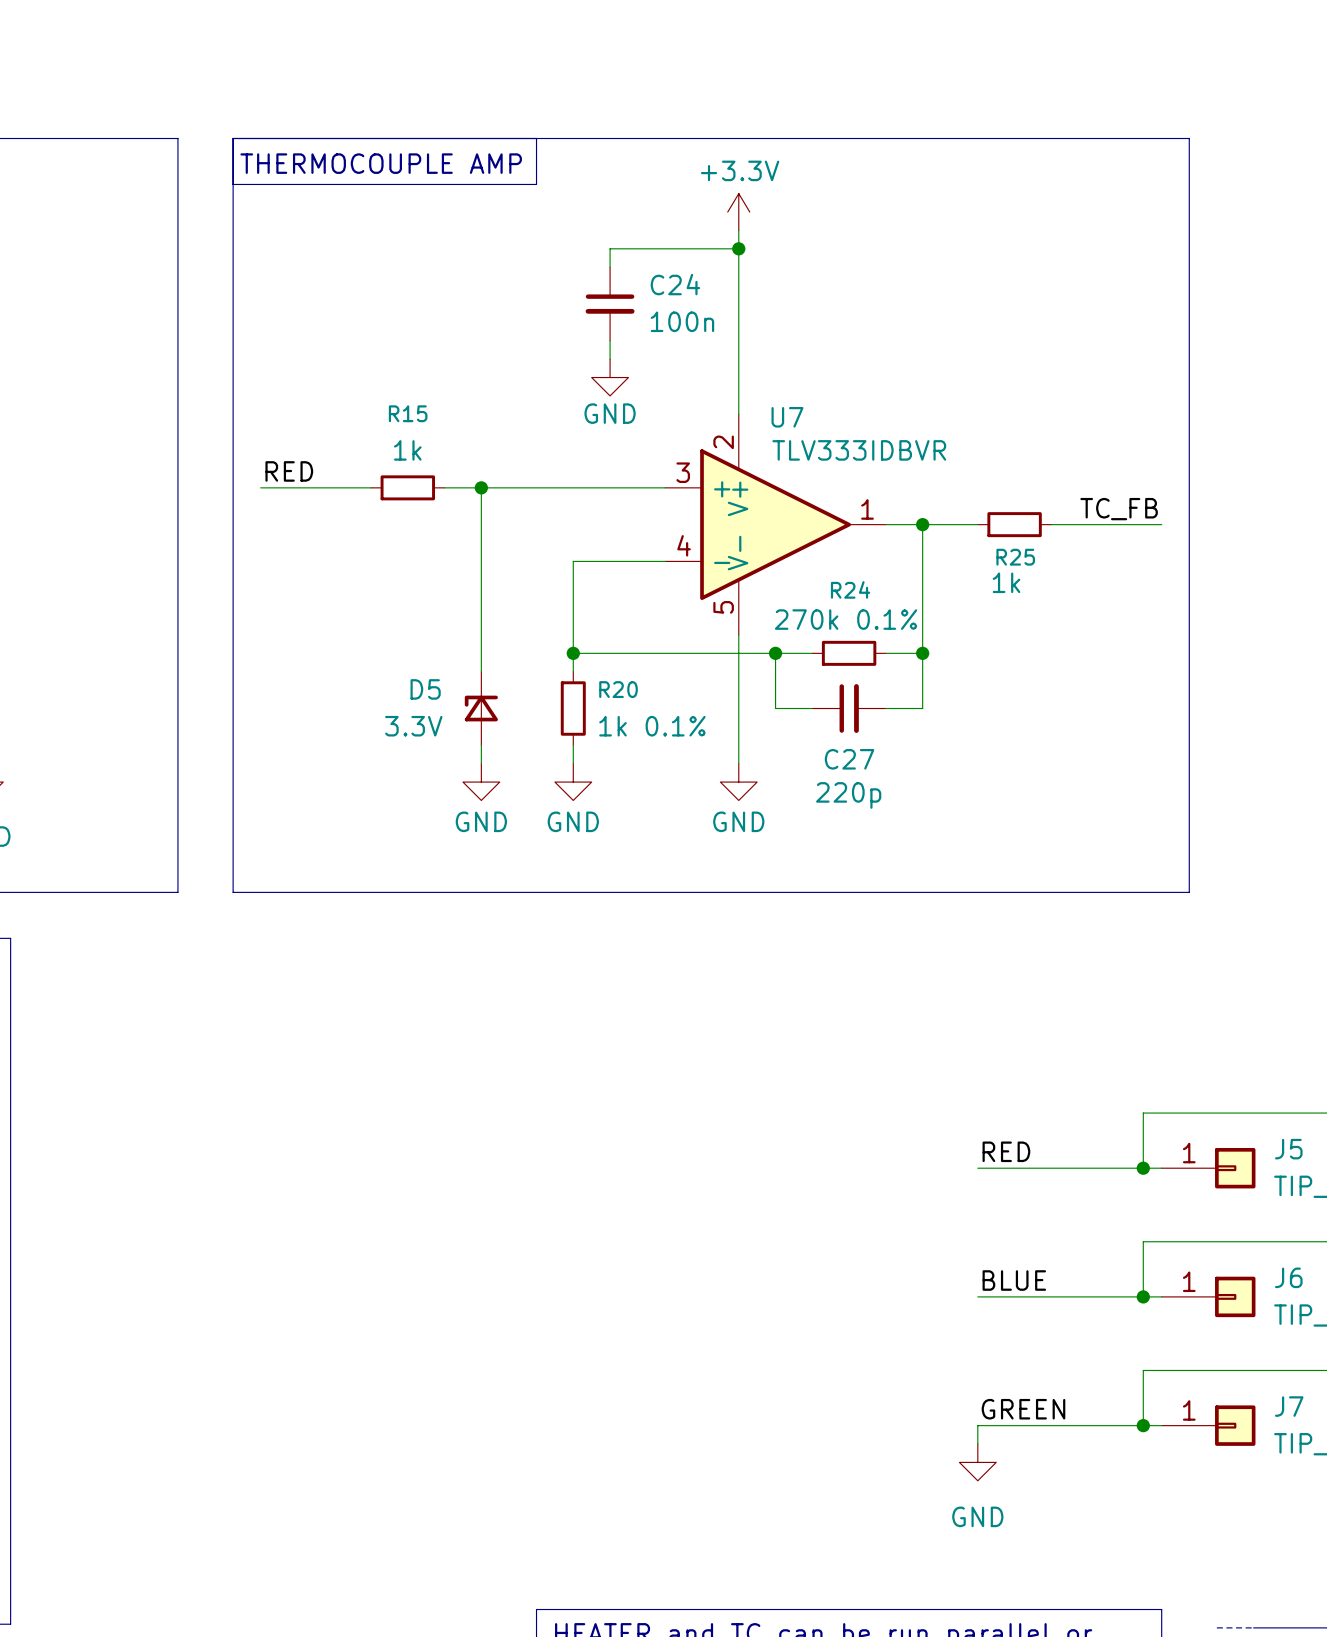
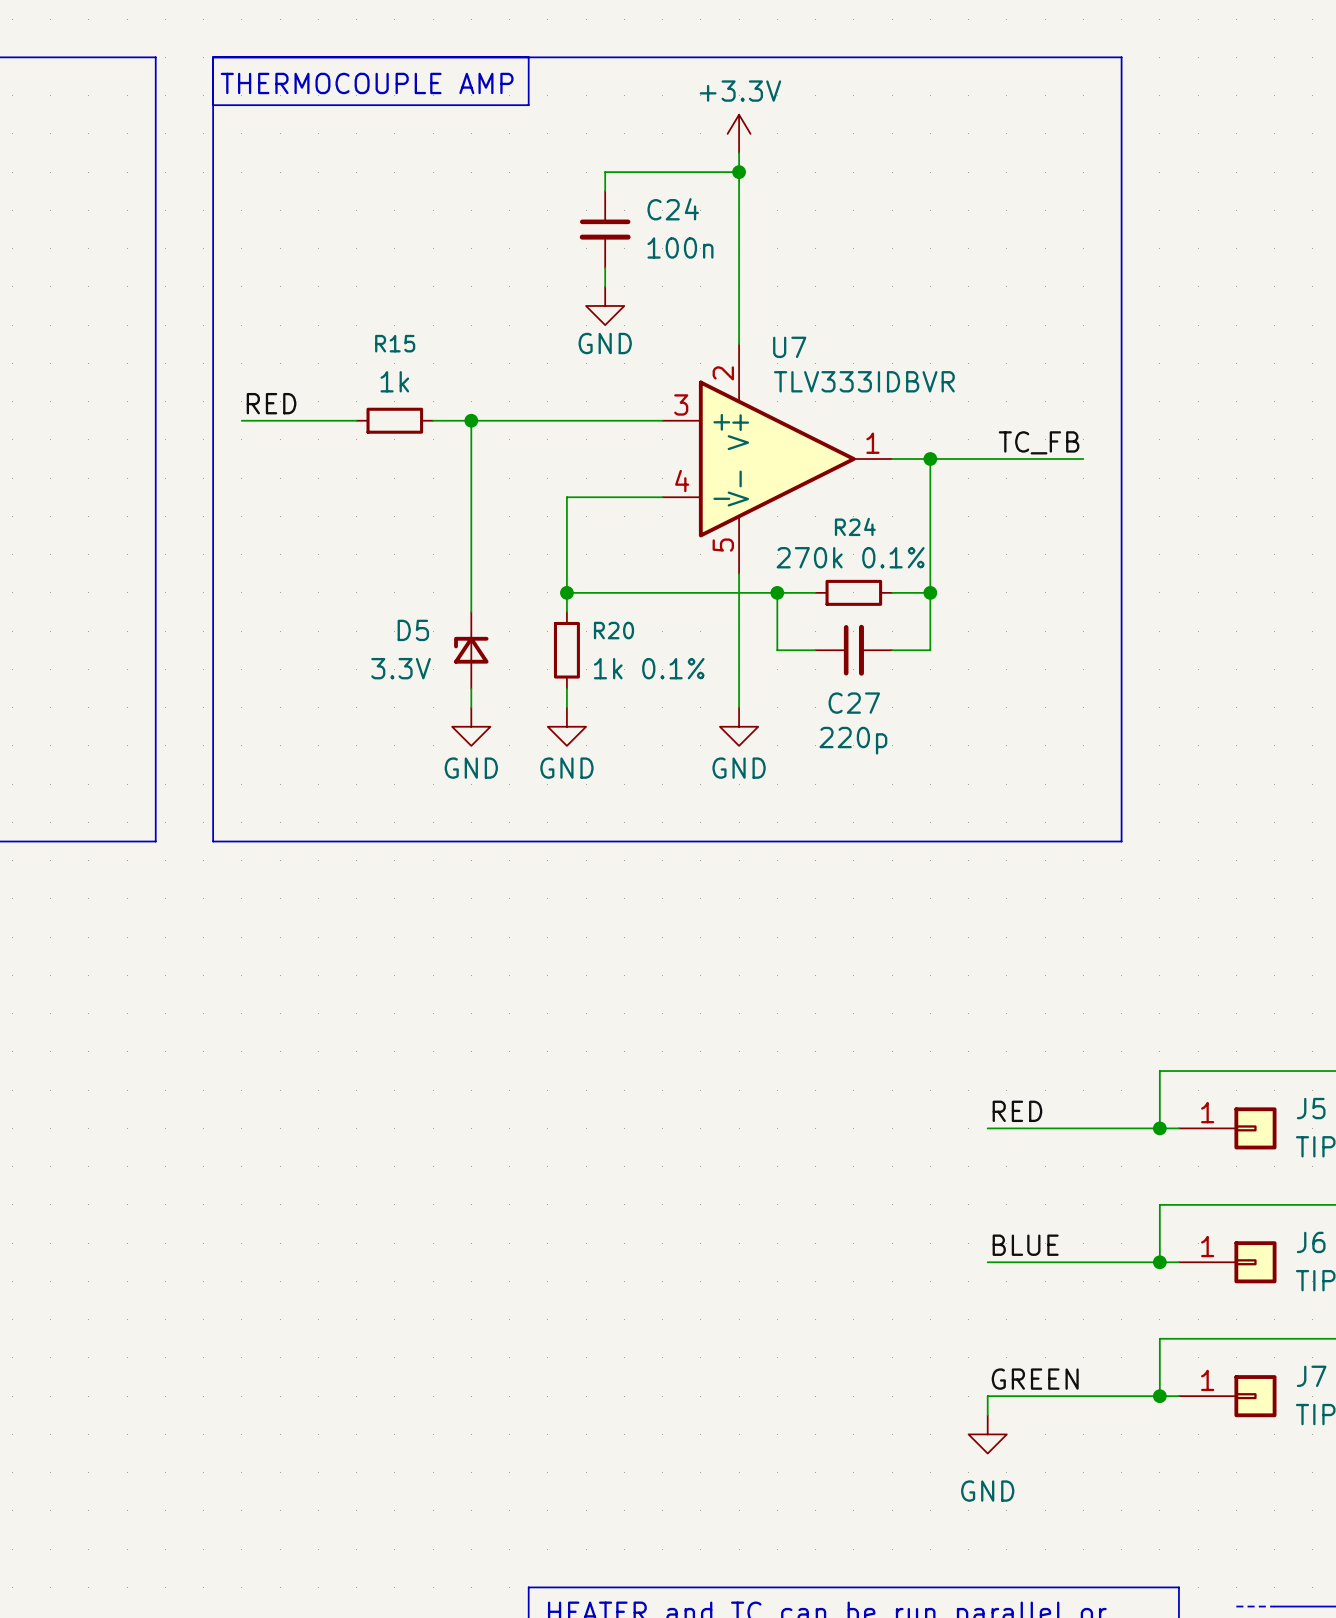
line: (1106, 138) (1189, 138) (1189, 892) (1106, 892) -> (1121, 57) (1121, 841)
label position: TC_FB (1119, 509) -> TC_FB (1039, 442)
wire: none -> (987, 458) (1064, 458)
R25: 1k (1014, 524) -> none
wire: (1069, 524) (1161, 524) -> none

